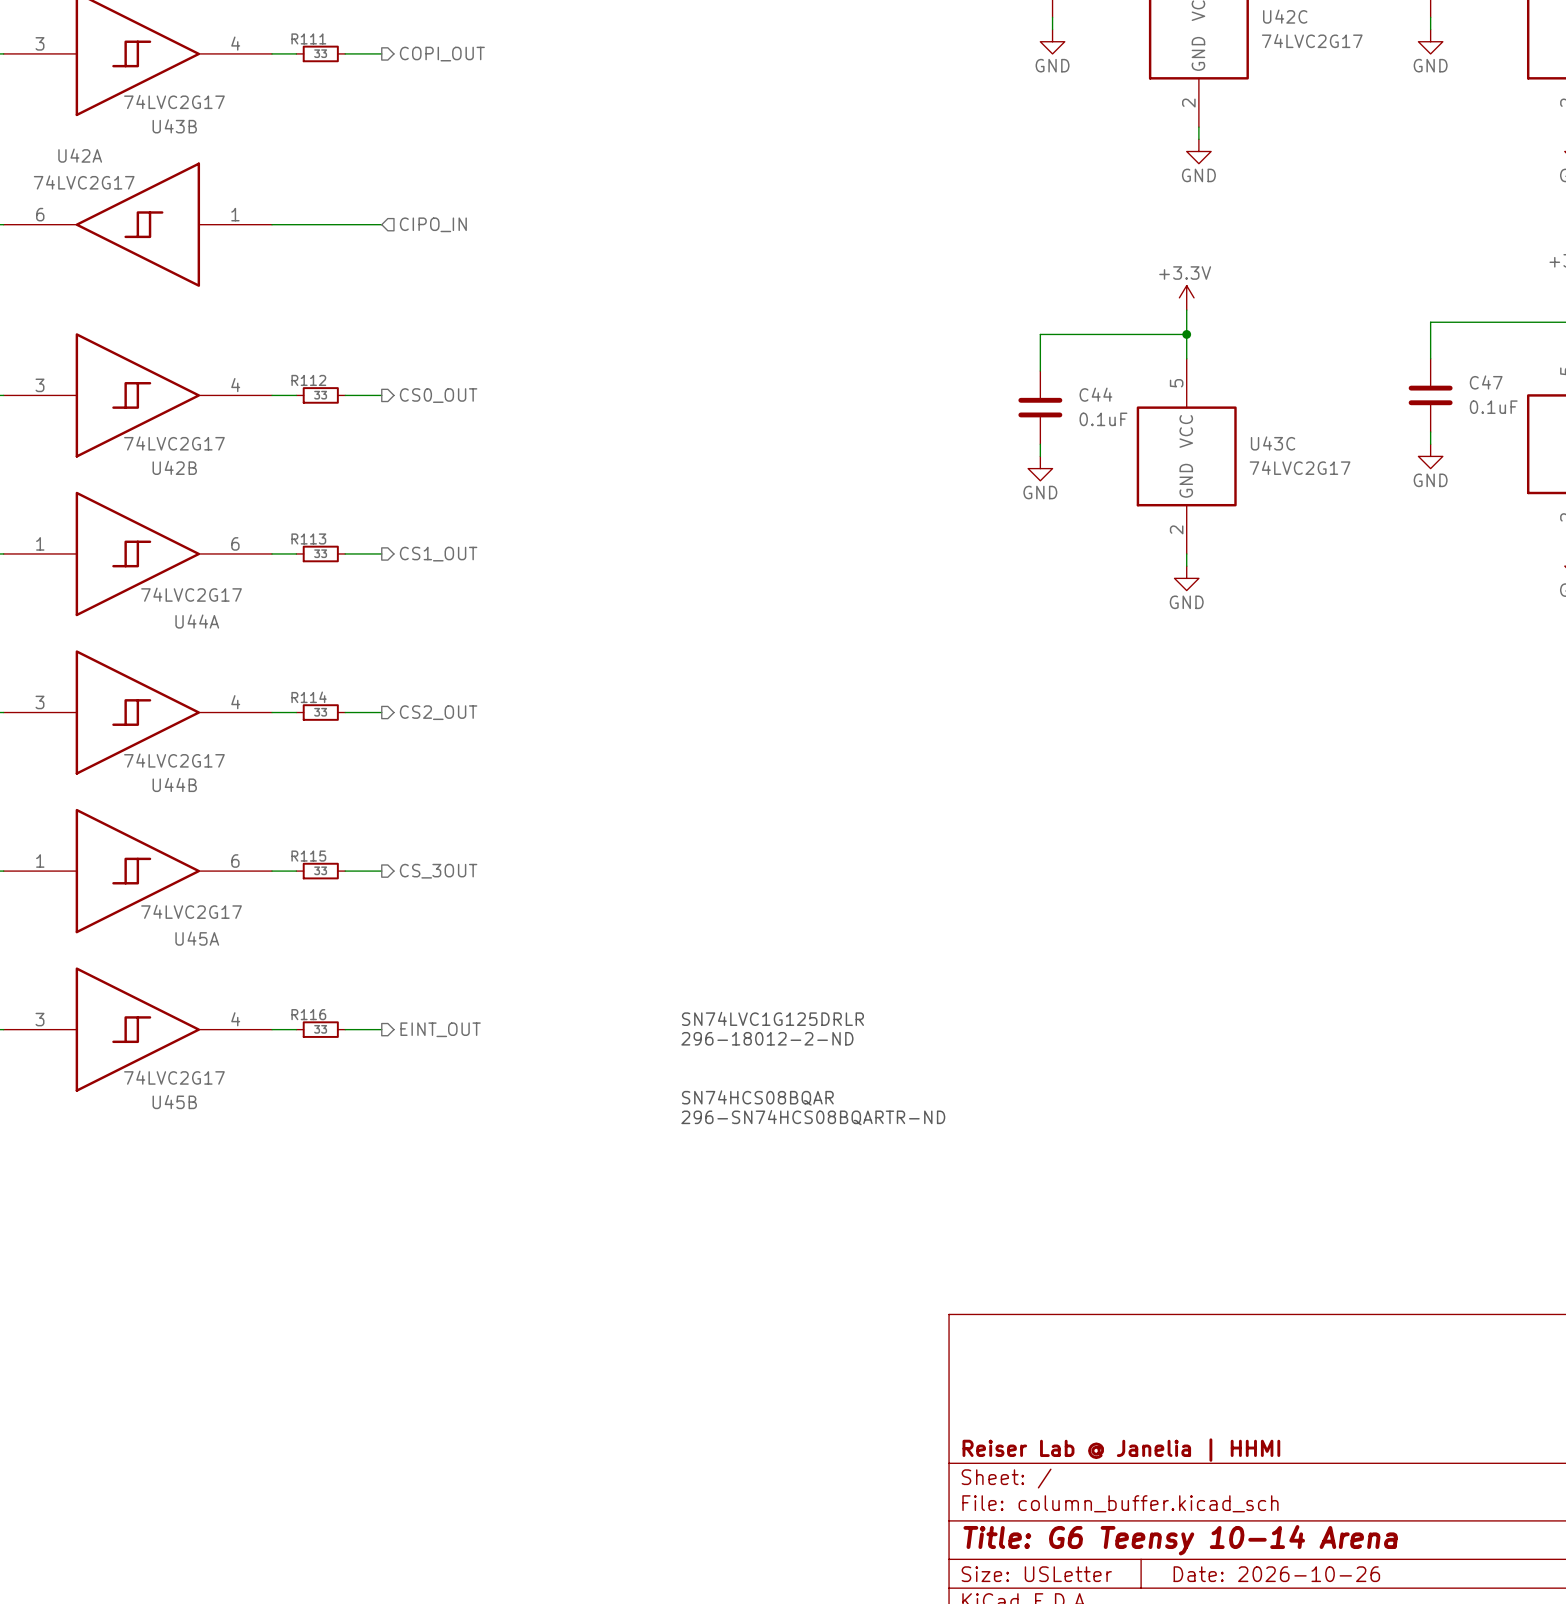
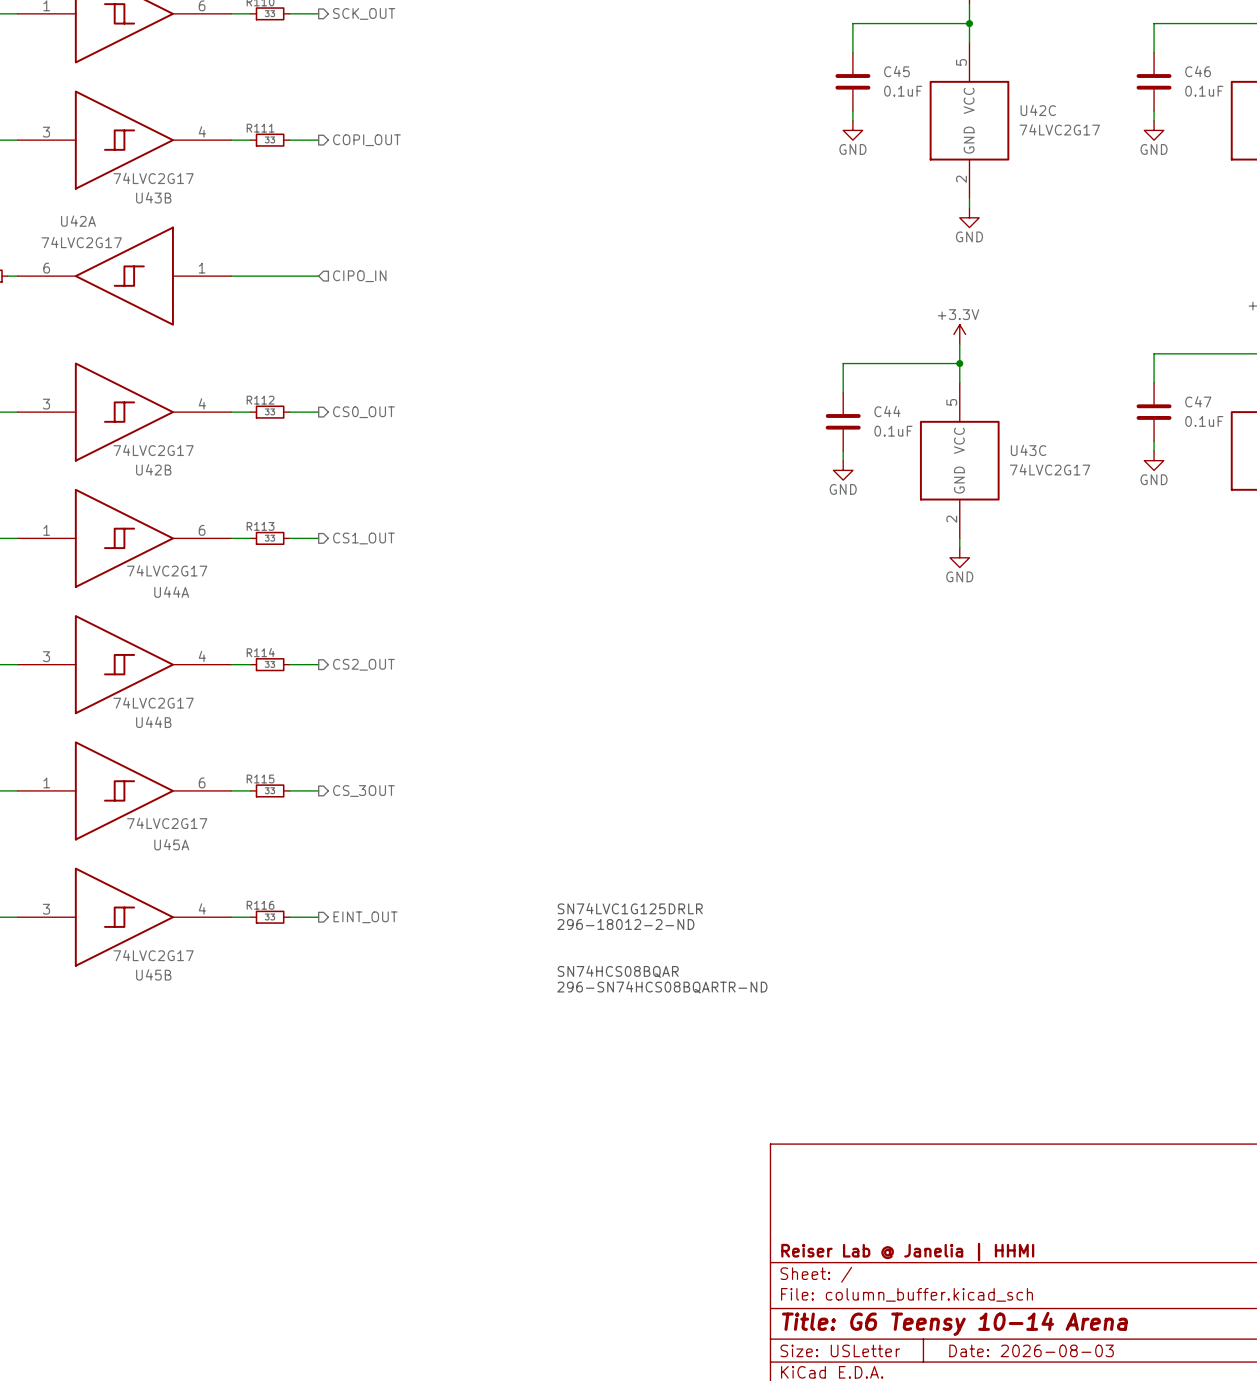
title block: Date: 2026-10-26 (1276, 1574) -> Date: 2026-08-03 (1031, 1350)

